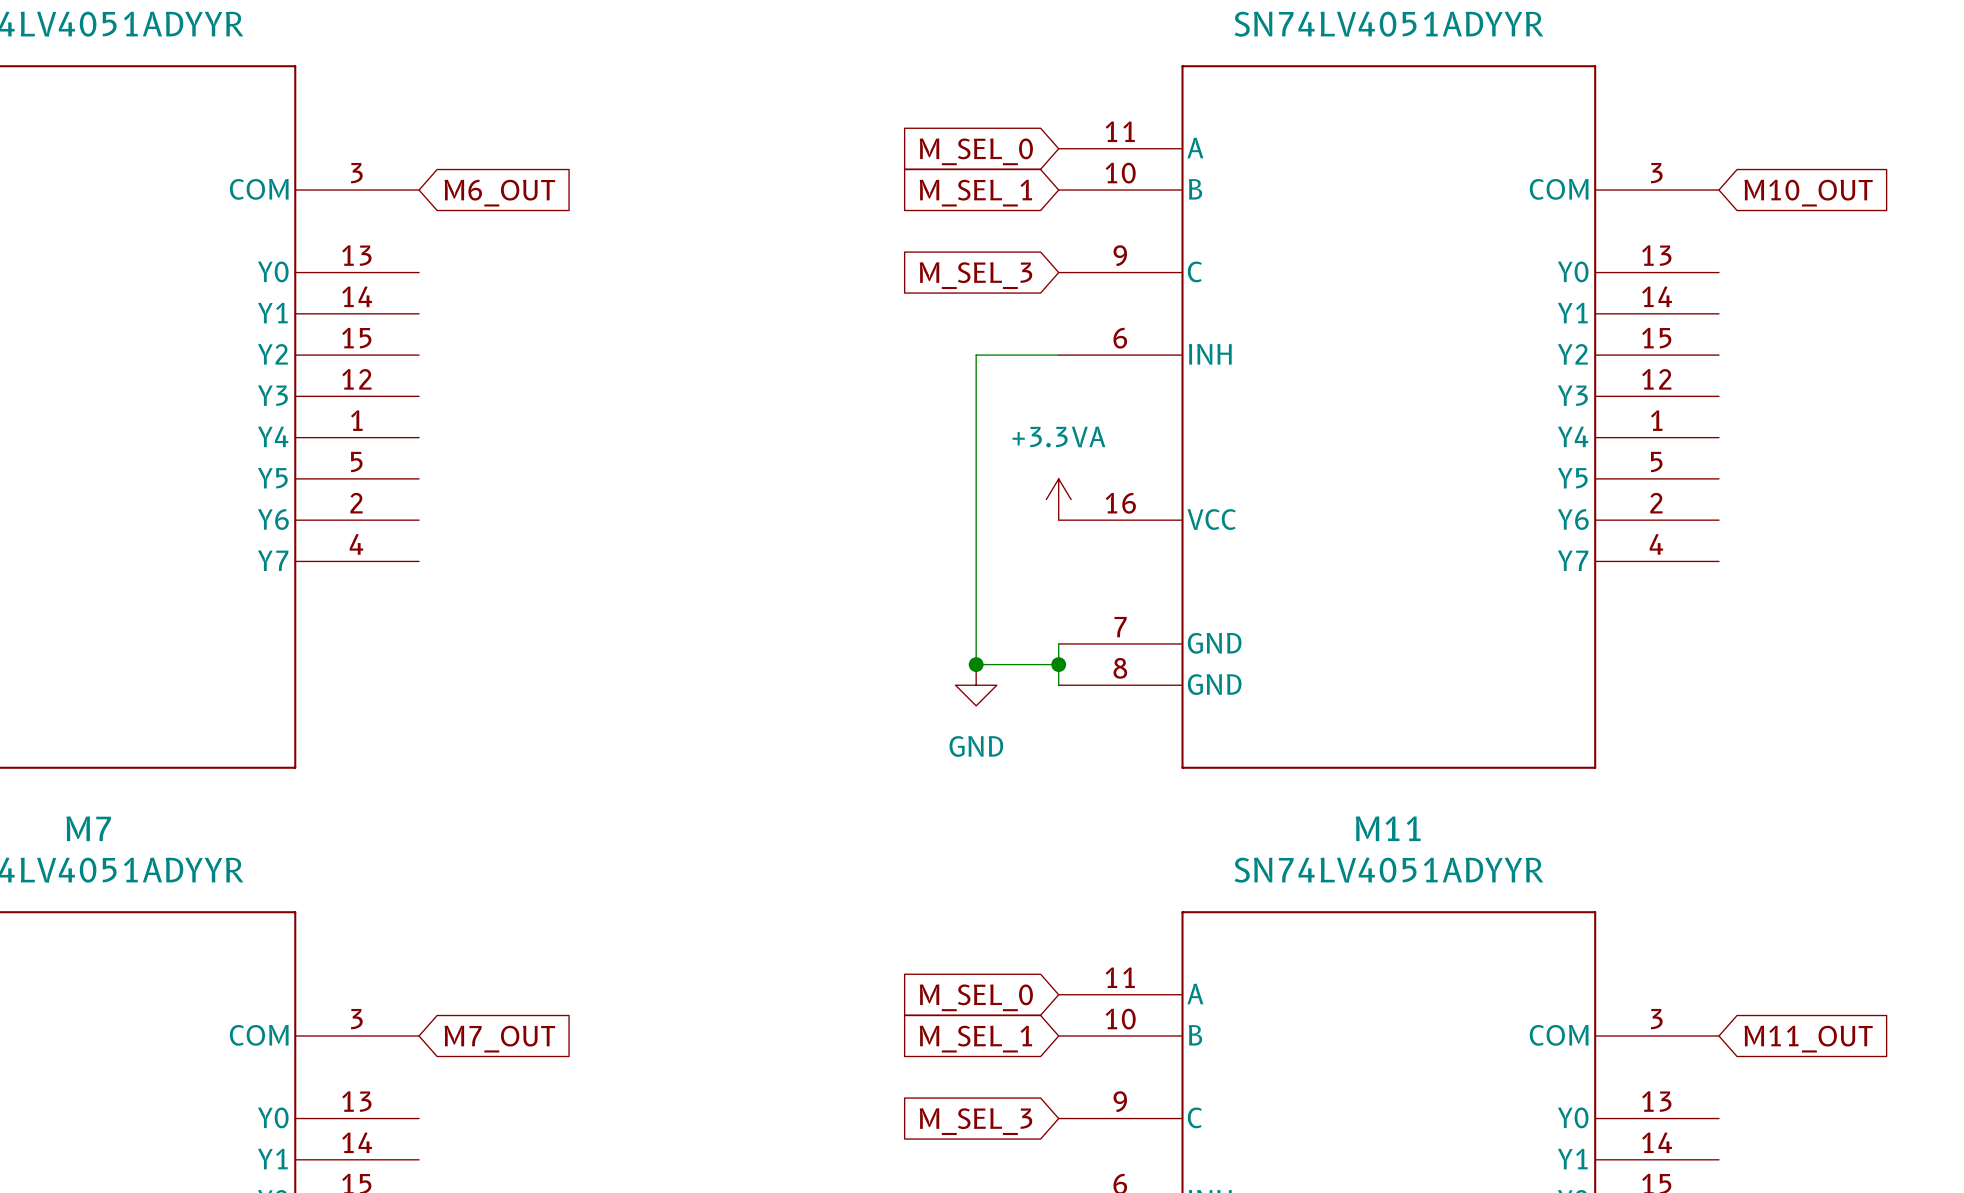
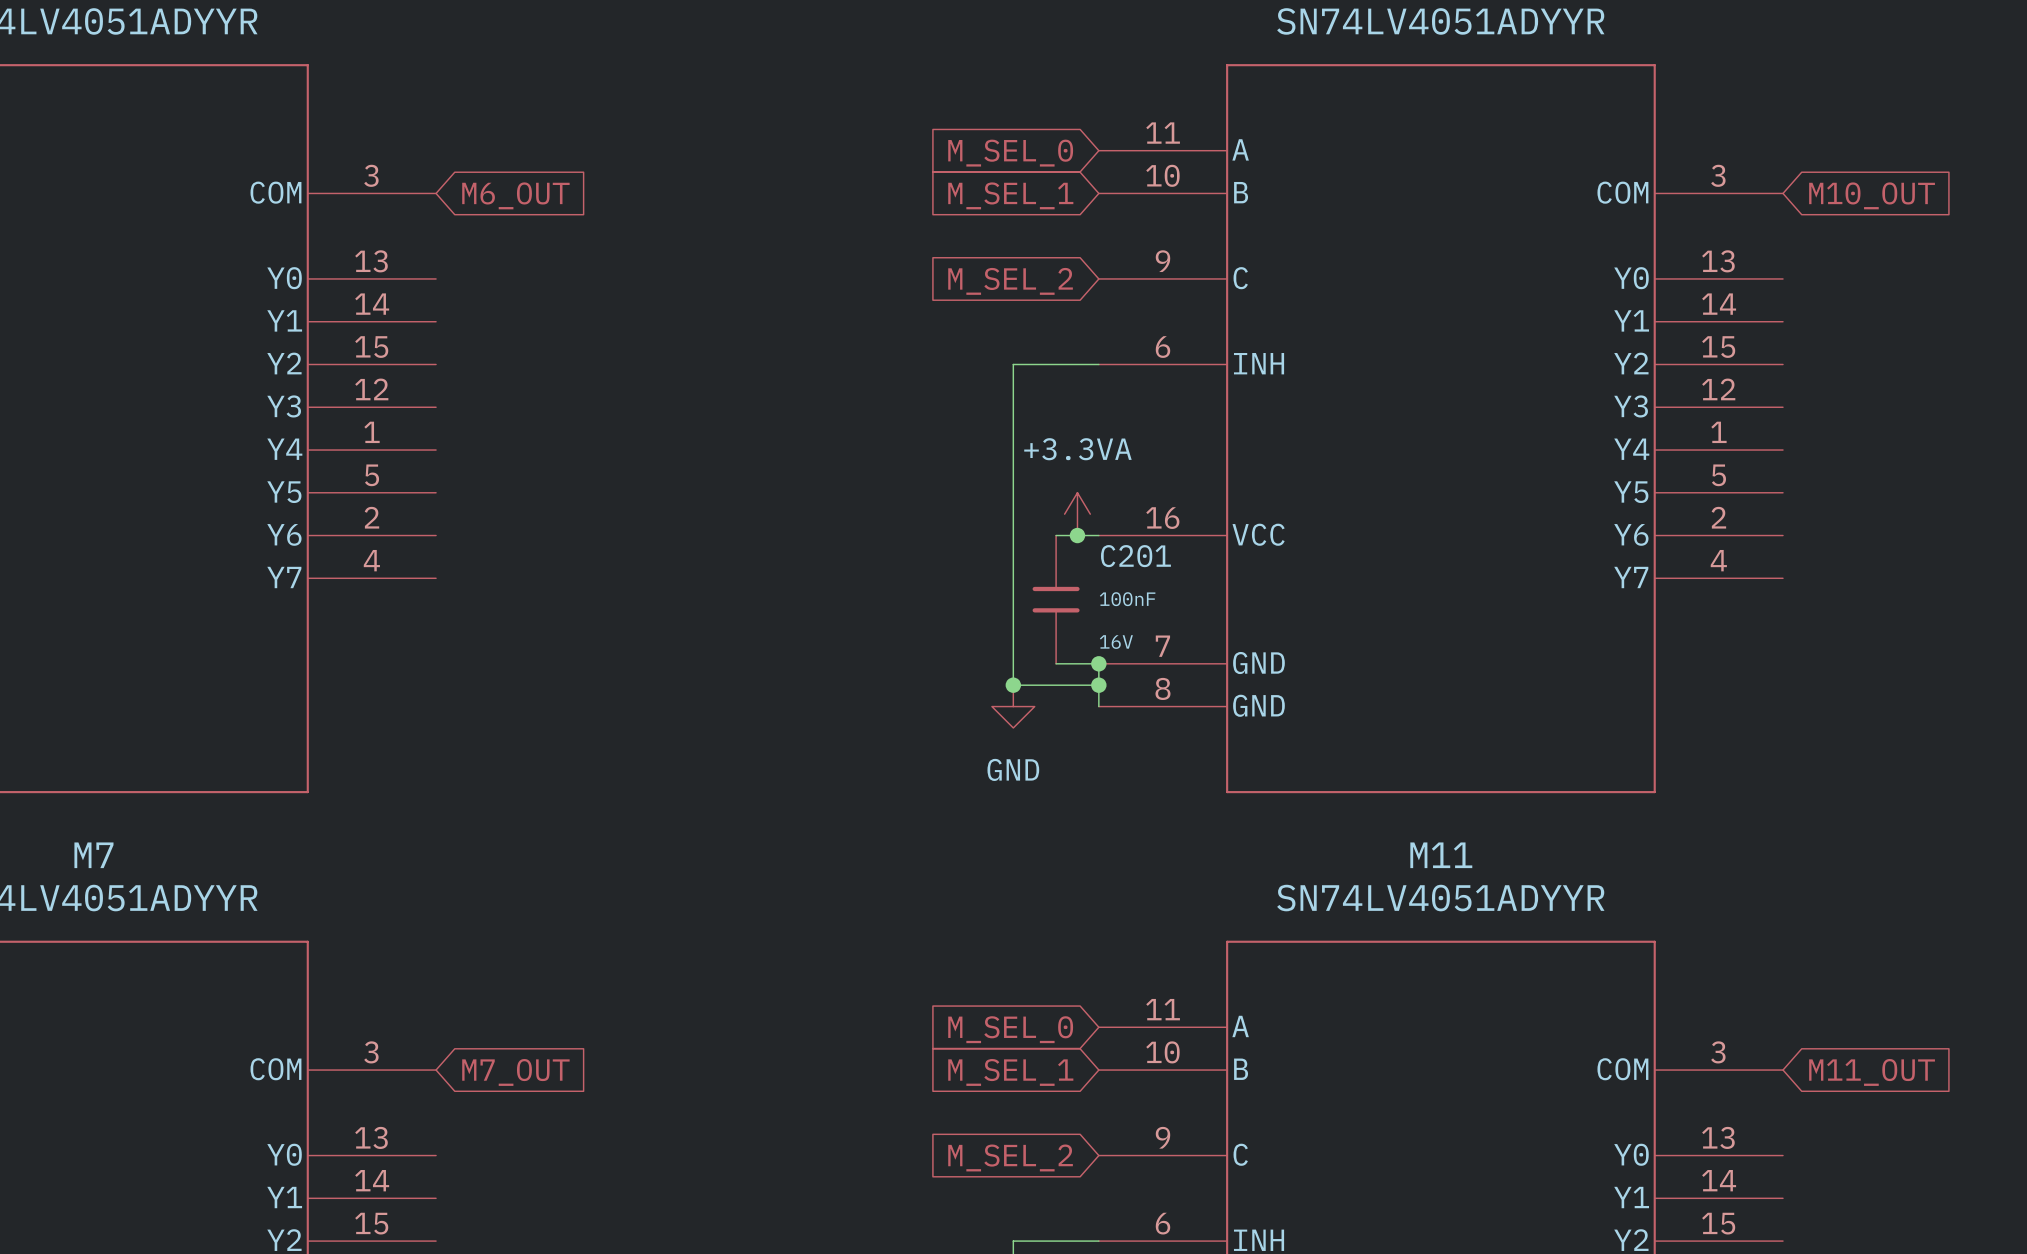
global label: M_SEL_3 (975, 275) -> M_SEL_2 (1010, 281)
power symbol position: +3.3VA (1058, 499) -> +3.3VA (1077, 514)
wire: none -> (1056, 535) (1098, 535)
junction: none -> (1077, 535)
C201: none -> 100nF (1056, 599)
wire: none -> (1056, 663) (1098, 663)
junction: none -> (1098, 663)
global label: M_SEL_3 (975, 1121) -> M_SEL_2 (1010, 1157)

